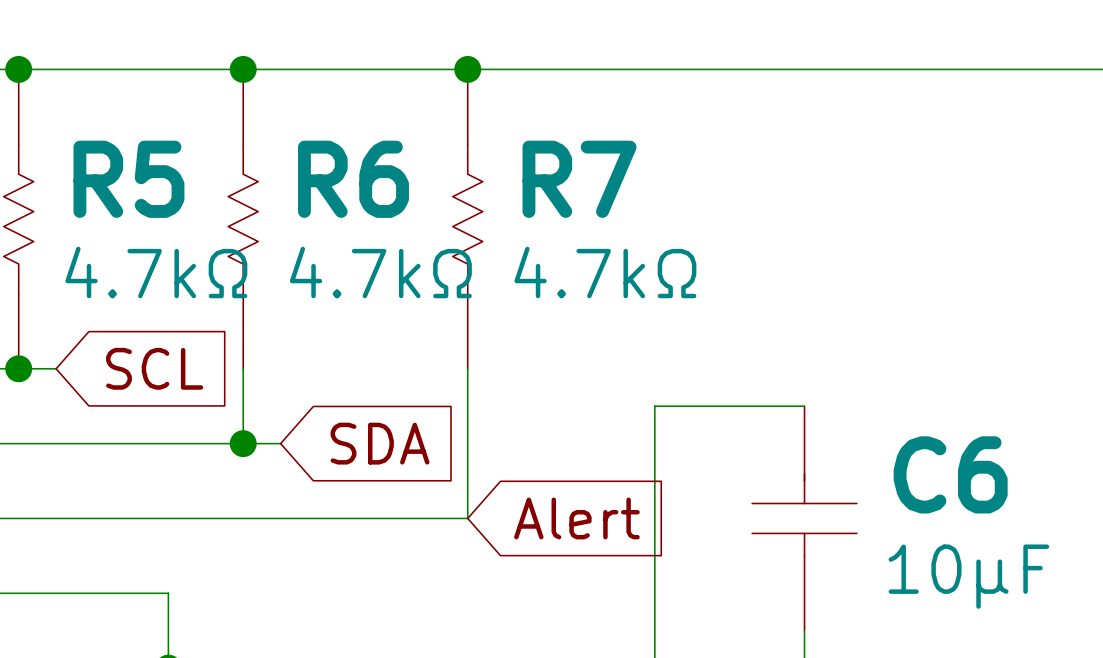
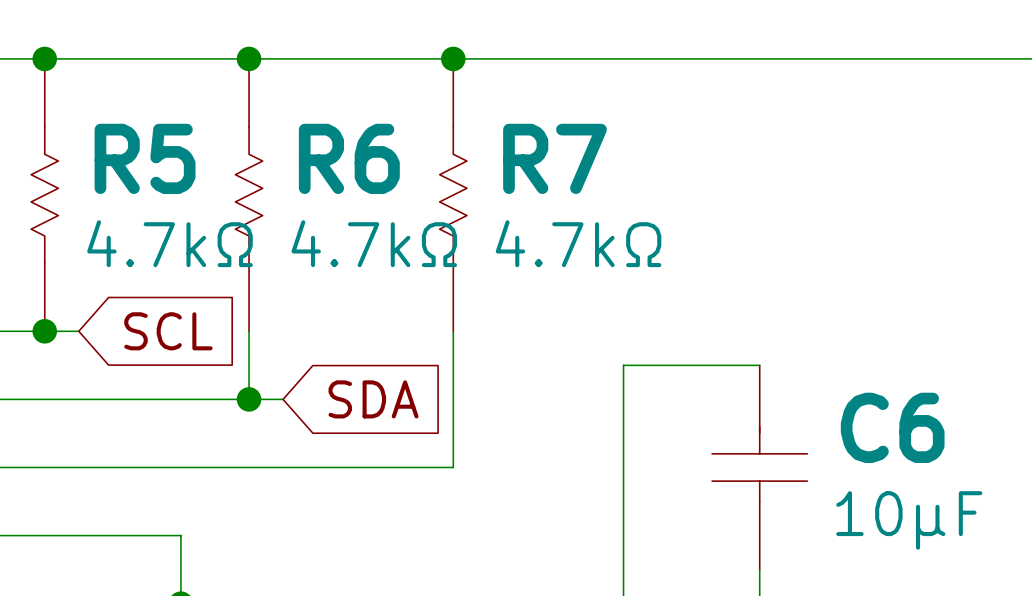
global label: Alert (576, 518) -> none

